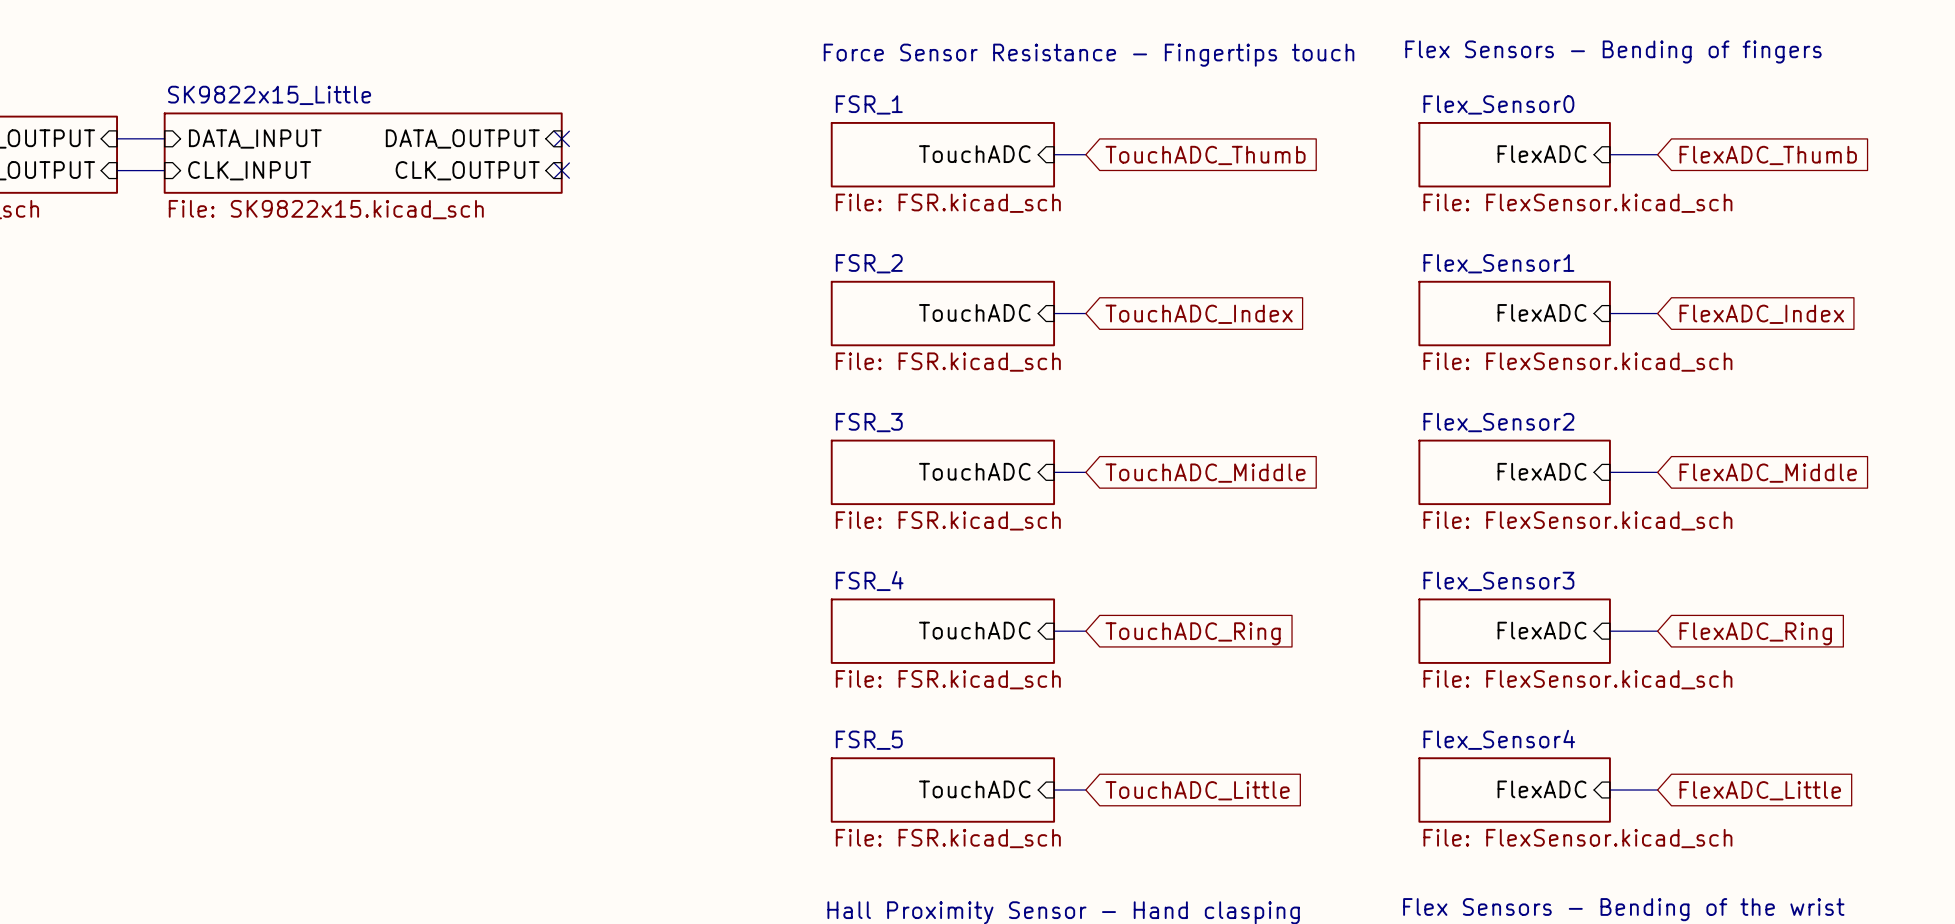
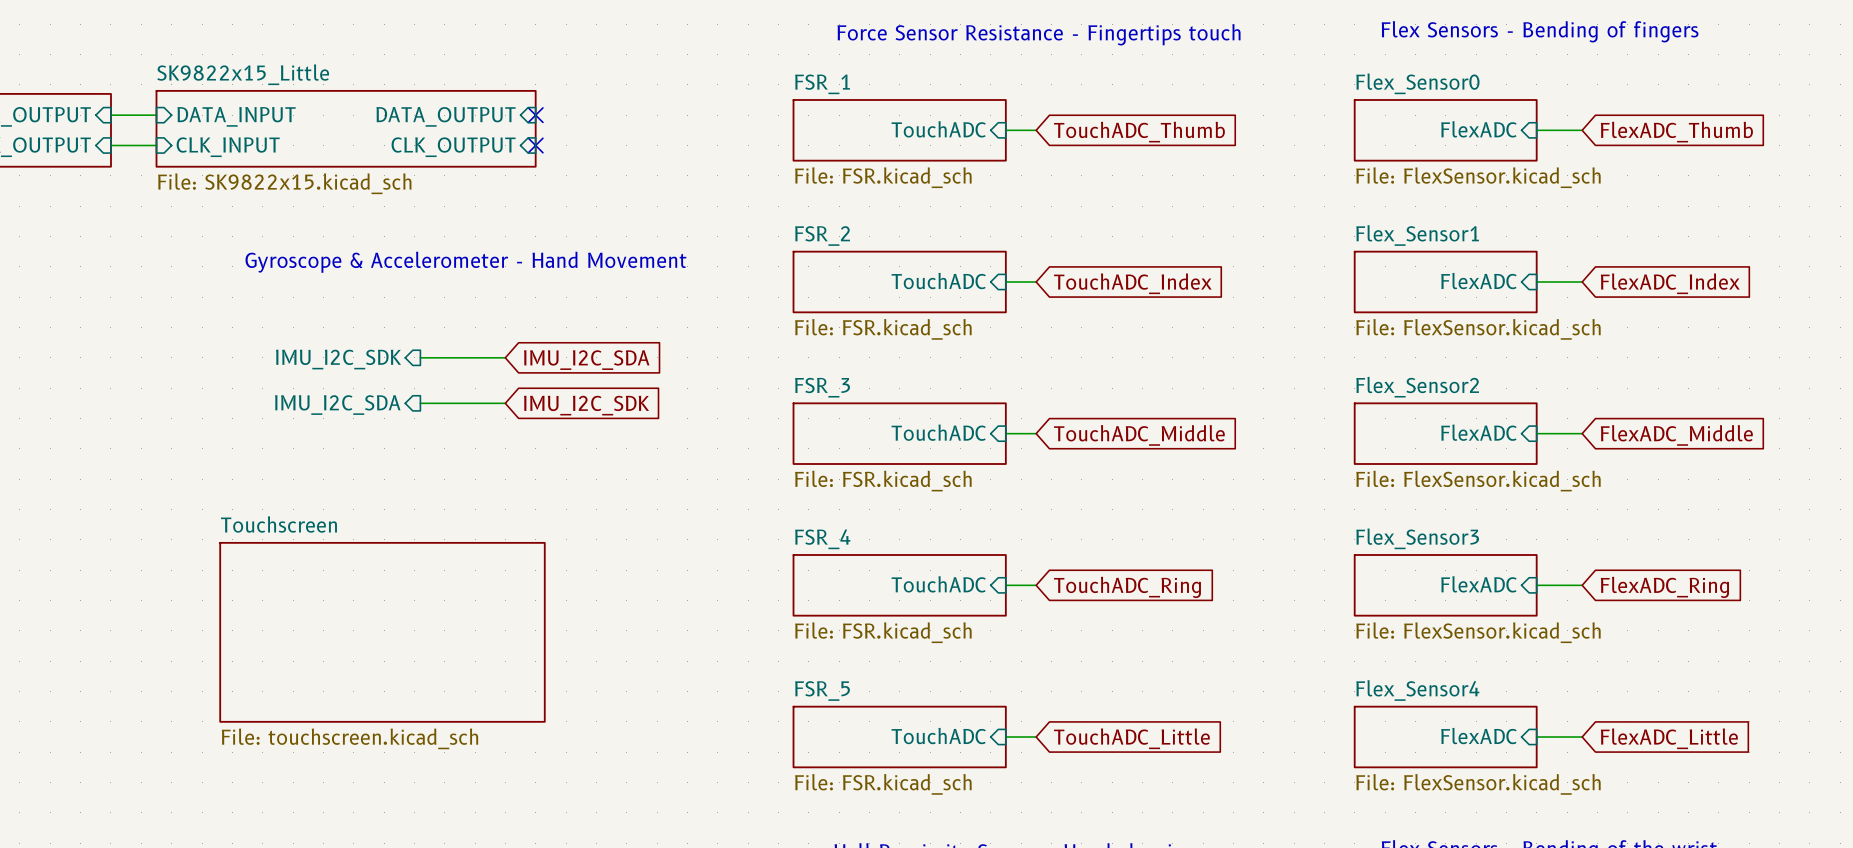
text: none -> Gyroscope & Accelerometer - Hand Movement (465, 262)
wire: none -> (420, 357) (505, 357)
sheet pin: none -> IMU_I2C_SDK (338, 359)
global label: none -> IMU_I2C_SDA (586, 360)
sheet pin: none -> IMU_I2C_SDA (337, 405)
wire: none -> (420, 403) (505, 403)
global label: none -> IMU_I2C_SDK (586, 405)
sheet Touchscreen: none -> File: touchscreen.kicad_sch (382, 632)

